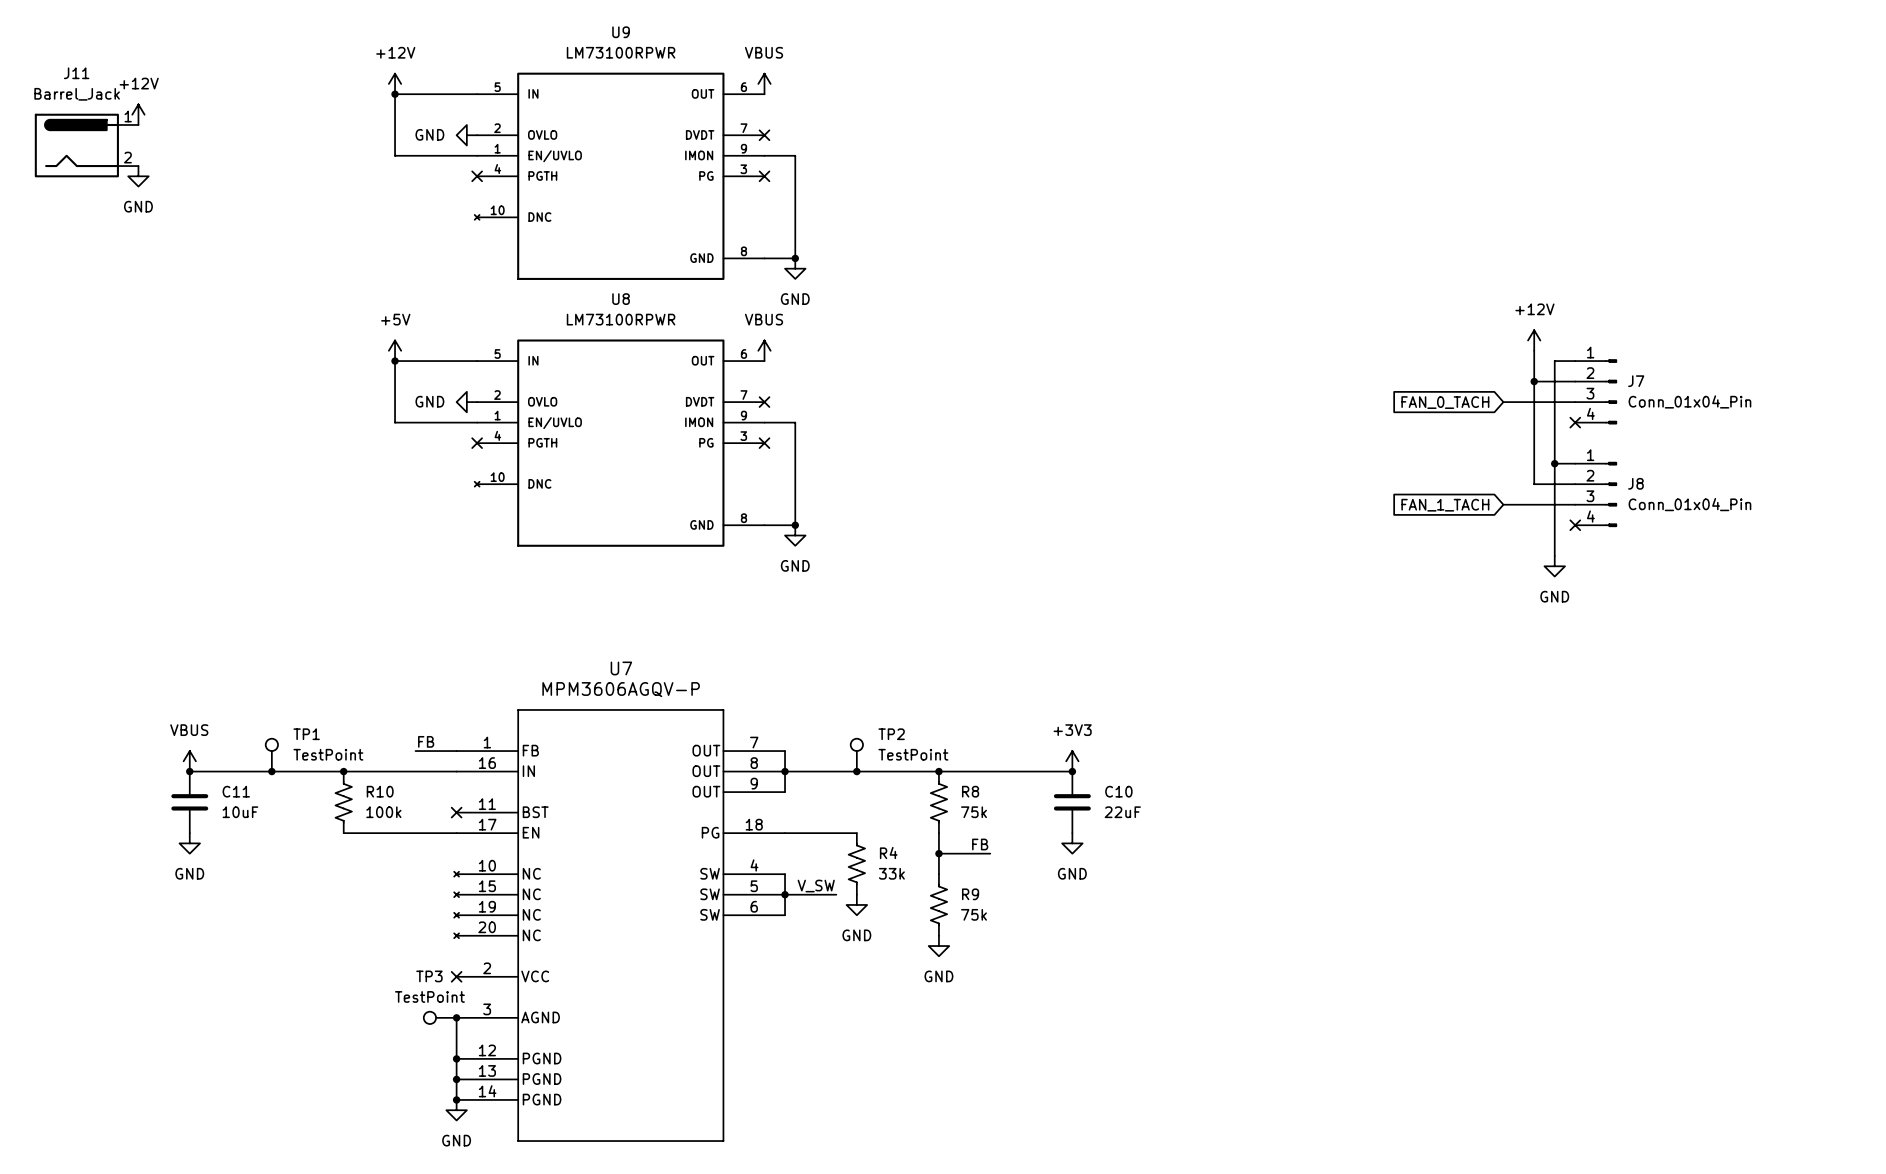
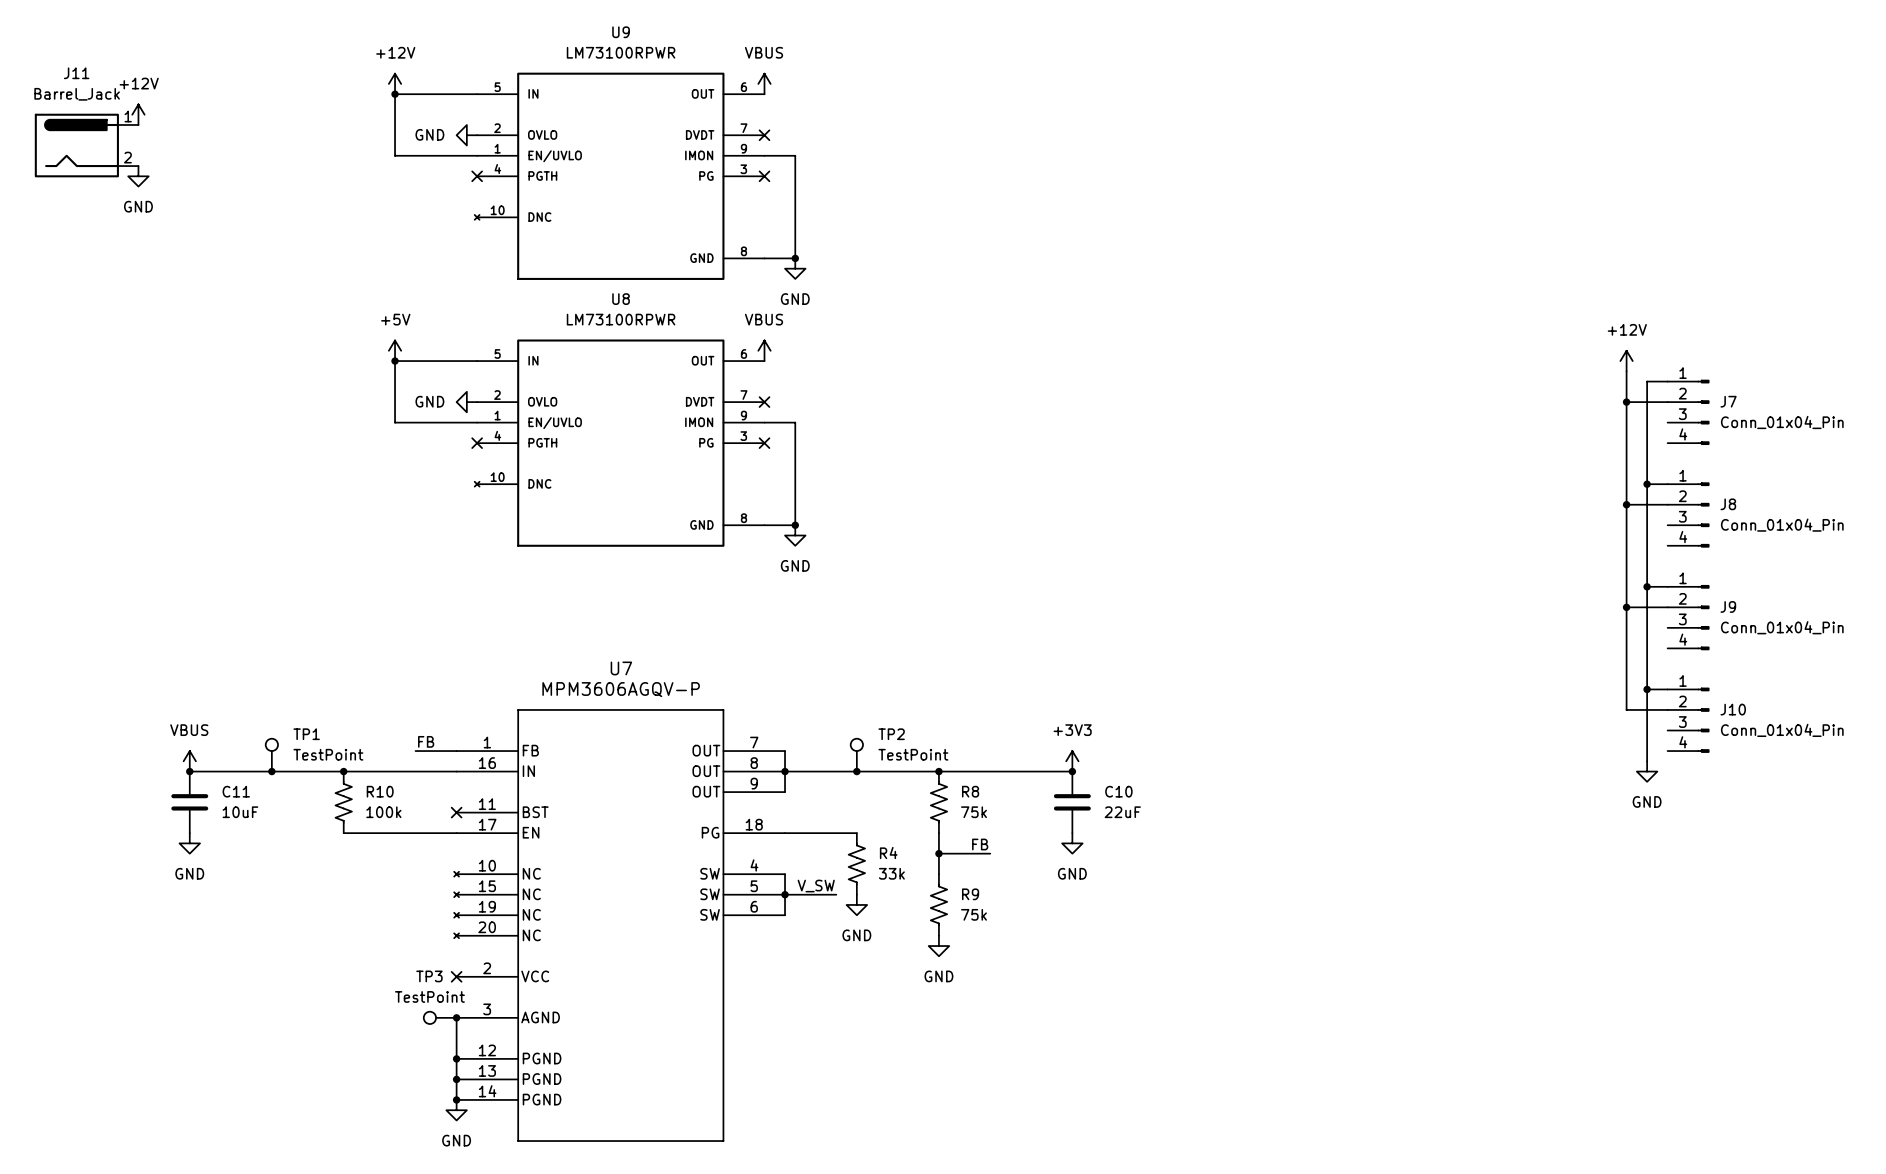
power symbol position: +12V (1534, 340) -> +12V (1626, 361)
wire: (1534, 350) (1534, 484) (1575, 484) -> none
wire: (1575, 361) (1554, 361) (1554, 556) -> none
wire: none -> (1626, 371) (1626, 709) (1667, 709)
wire: (1534, 381) (1575, 381) -> (1626, 402) (1667, 402)
junction: (1534, 381) -> none
wire: none -> (1667, 381) (1647, 381) (1647, 761)
J7 position: (1596, 391) -> (1688, 412)
global label: FAN_0_TACH (1445, 402) -> none
wire: (1503, 402) (1575, 402) -> none
junction: none -> (1626, 402)
no-connect mark: (1575, 422) -> none
wire: (1554, 463) (1575, 463) -> (1647, 484) (1667, 484)
junction: (1554, 463) -> none
junction: none -> (1647, 484)
J8 position: (1596, 494) -> (1688, 514)
wire: (1503, 504) (1575, 504) -> none
wire: none -> (1626, 504) (1667, 504)
junction: none -> (1626, 504)
global label: FAN_1_TACH (1445, 505) -> none
no-connect mark: (1575, 525) -> none
power symbol: GND (1554, 566) -> none
wire: none -> (1647, 586) (1667, 586)
junction: none -> (1647, 586)
wire: none -> (1626, 607) (1667, 607)
junction: none -> (1626, 607)
J9: none -> Conn_01x04_Pin (1688, 617)
wire: none -> (1647, 689) (1667, 689)
junction: none -> (1647, 689)
J10: none -> Conn_01x04_Pin (1688, 720)
power symbol: none -> GND (1647, 771)

